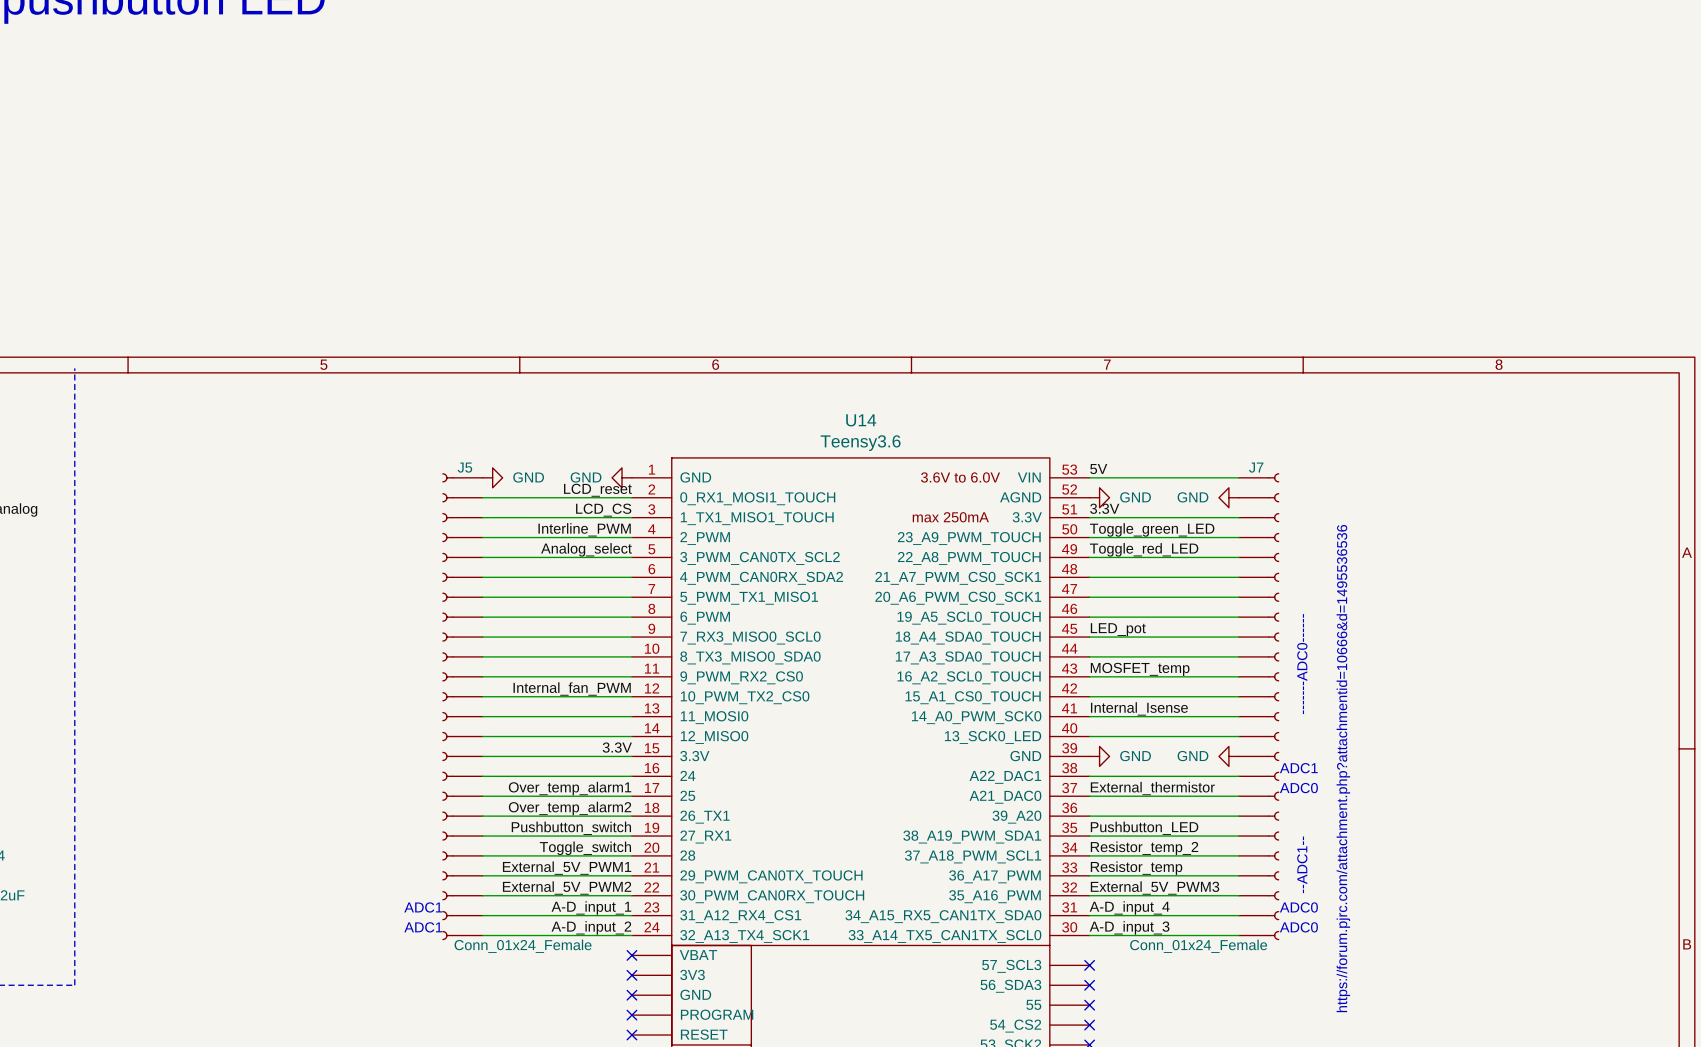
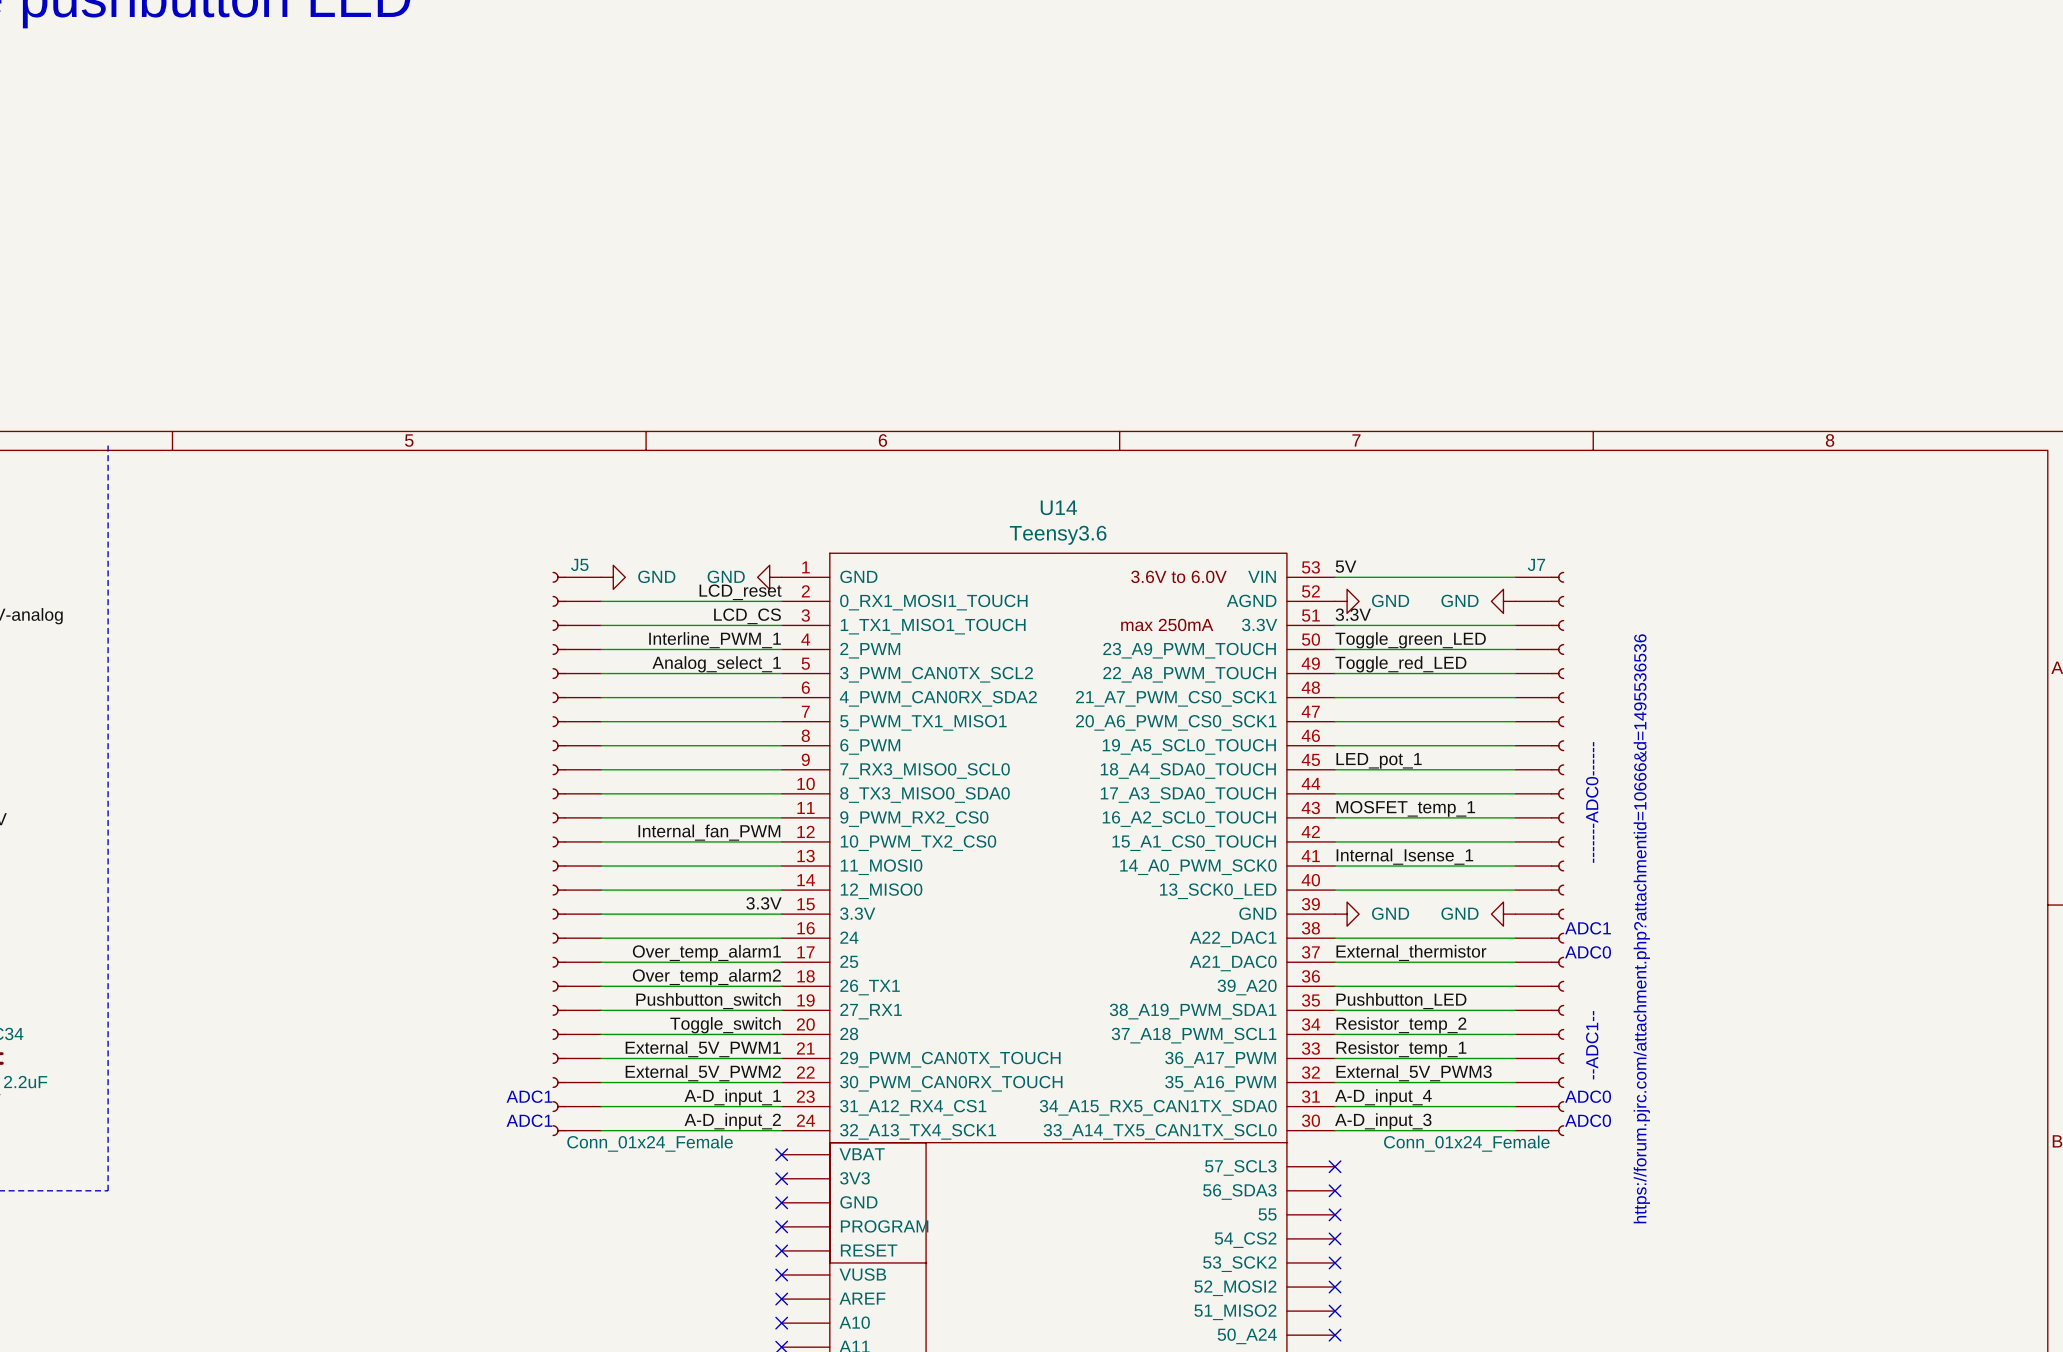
label: Interline_PWM (584, 529) -> Interline_PWM_1 (715, 640)
label: Analog_select (586, 549) -> Analog_select_1 (716, 664)
label: LED_pot (1118, 629) -> LED_pot_1 (1379, 760)
label: MOSFET_temp (1140, 669) -> MOSFET_temp_1 (1405, 808)
label: Internal_Isense (1139, 708) -> Internal_Isense_1 (1404, 856)
label: Resistor_temp (1136, 868) -> Resistor_temp_1 (1401, 1049)

